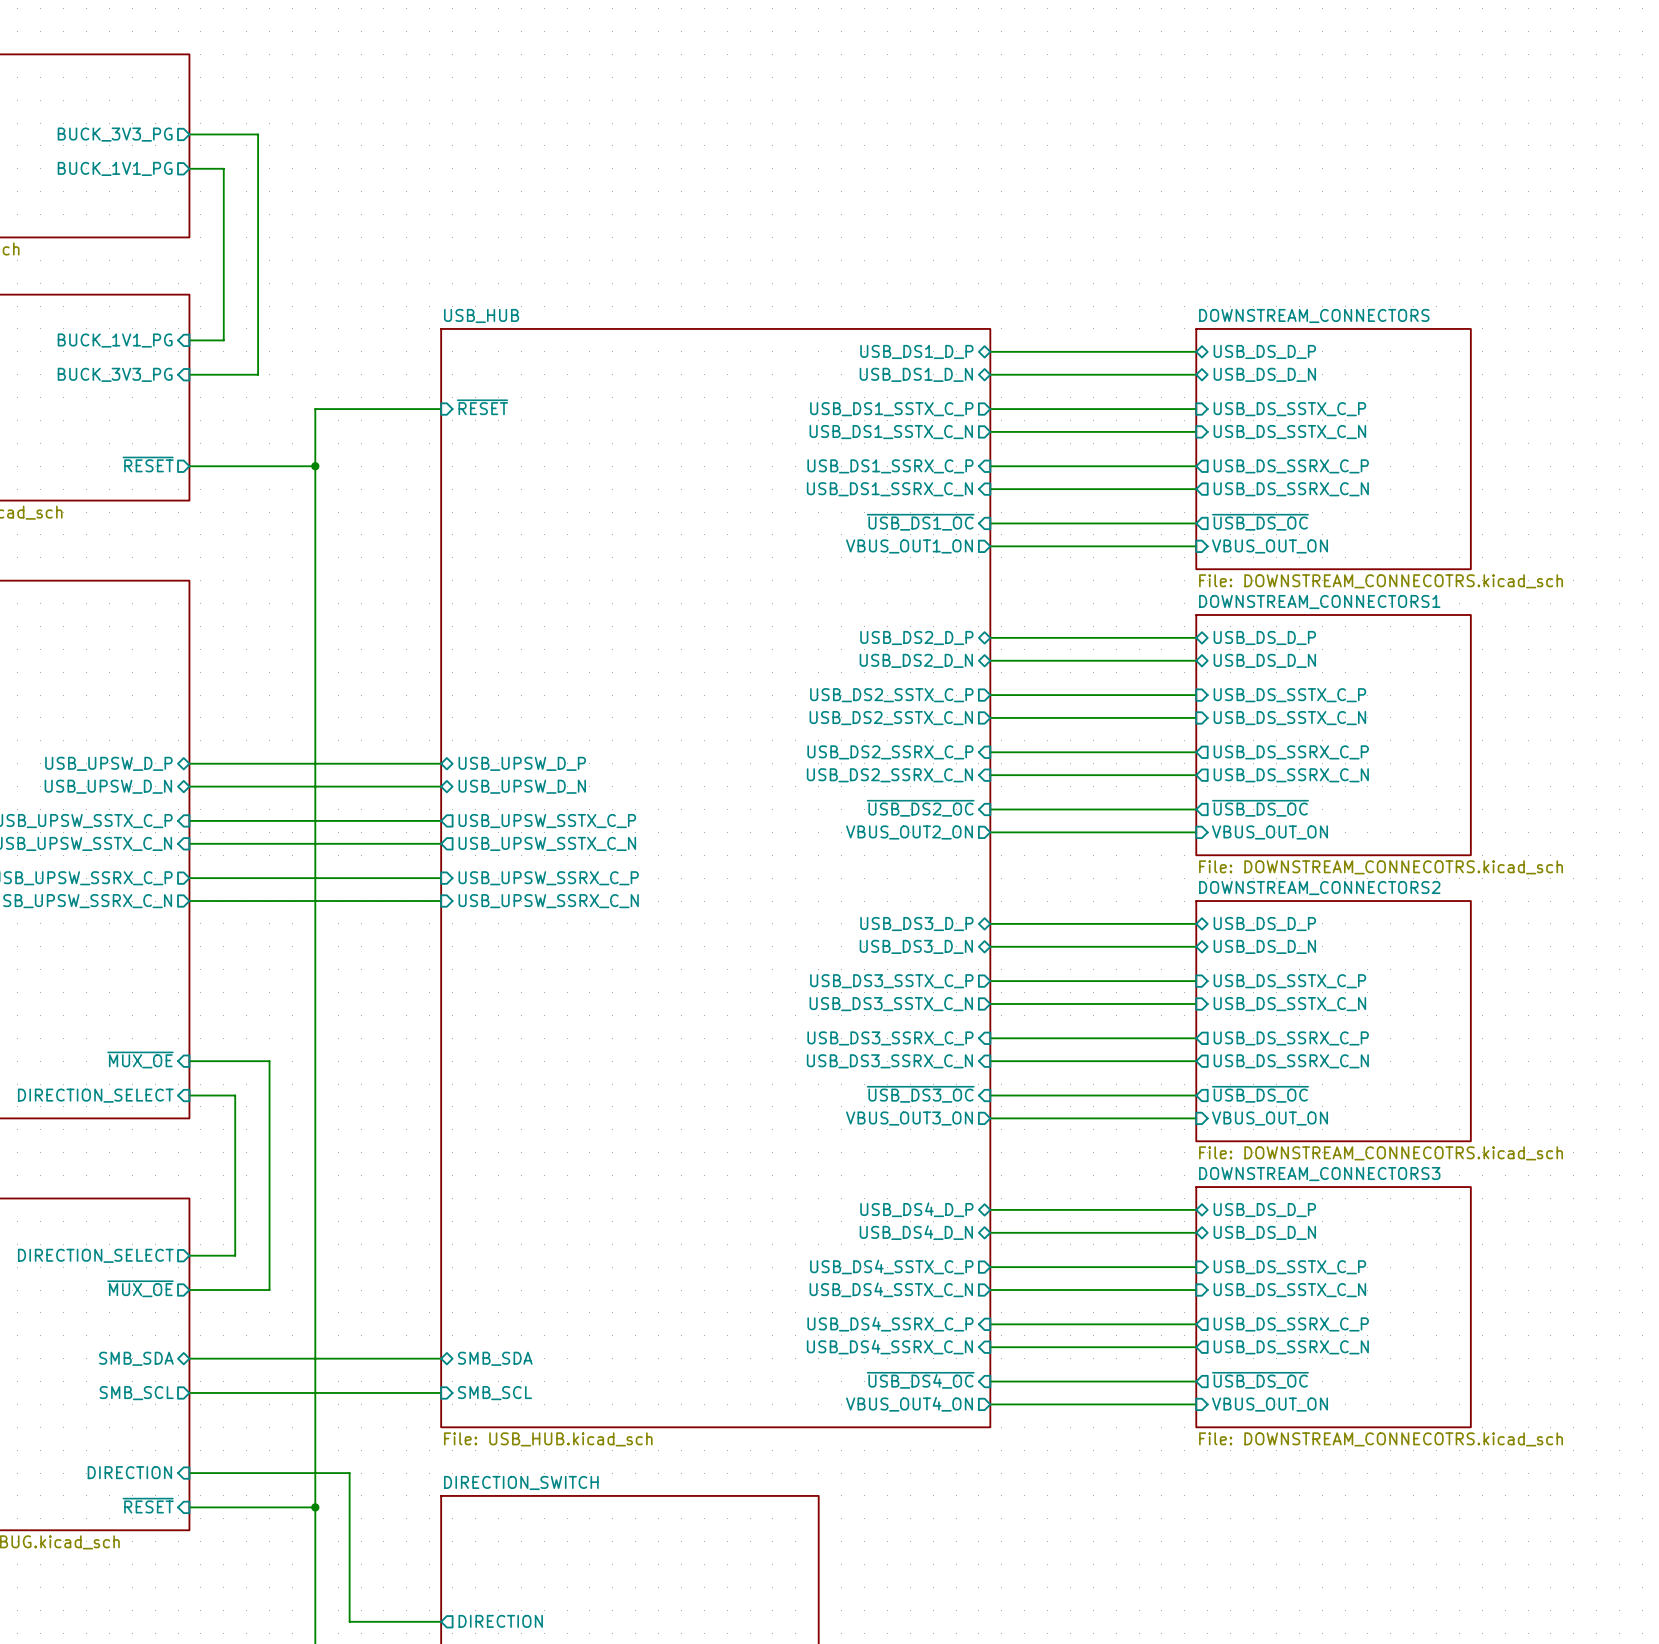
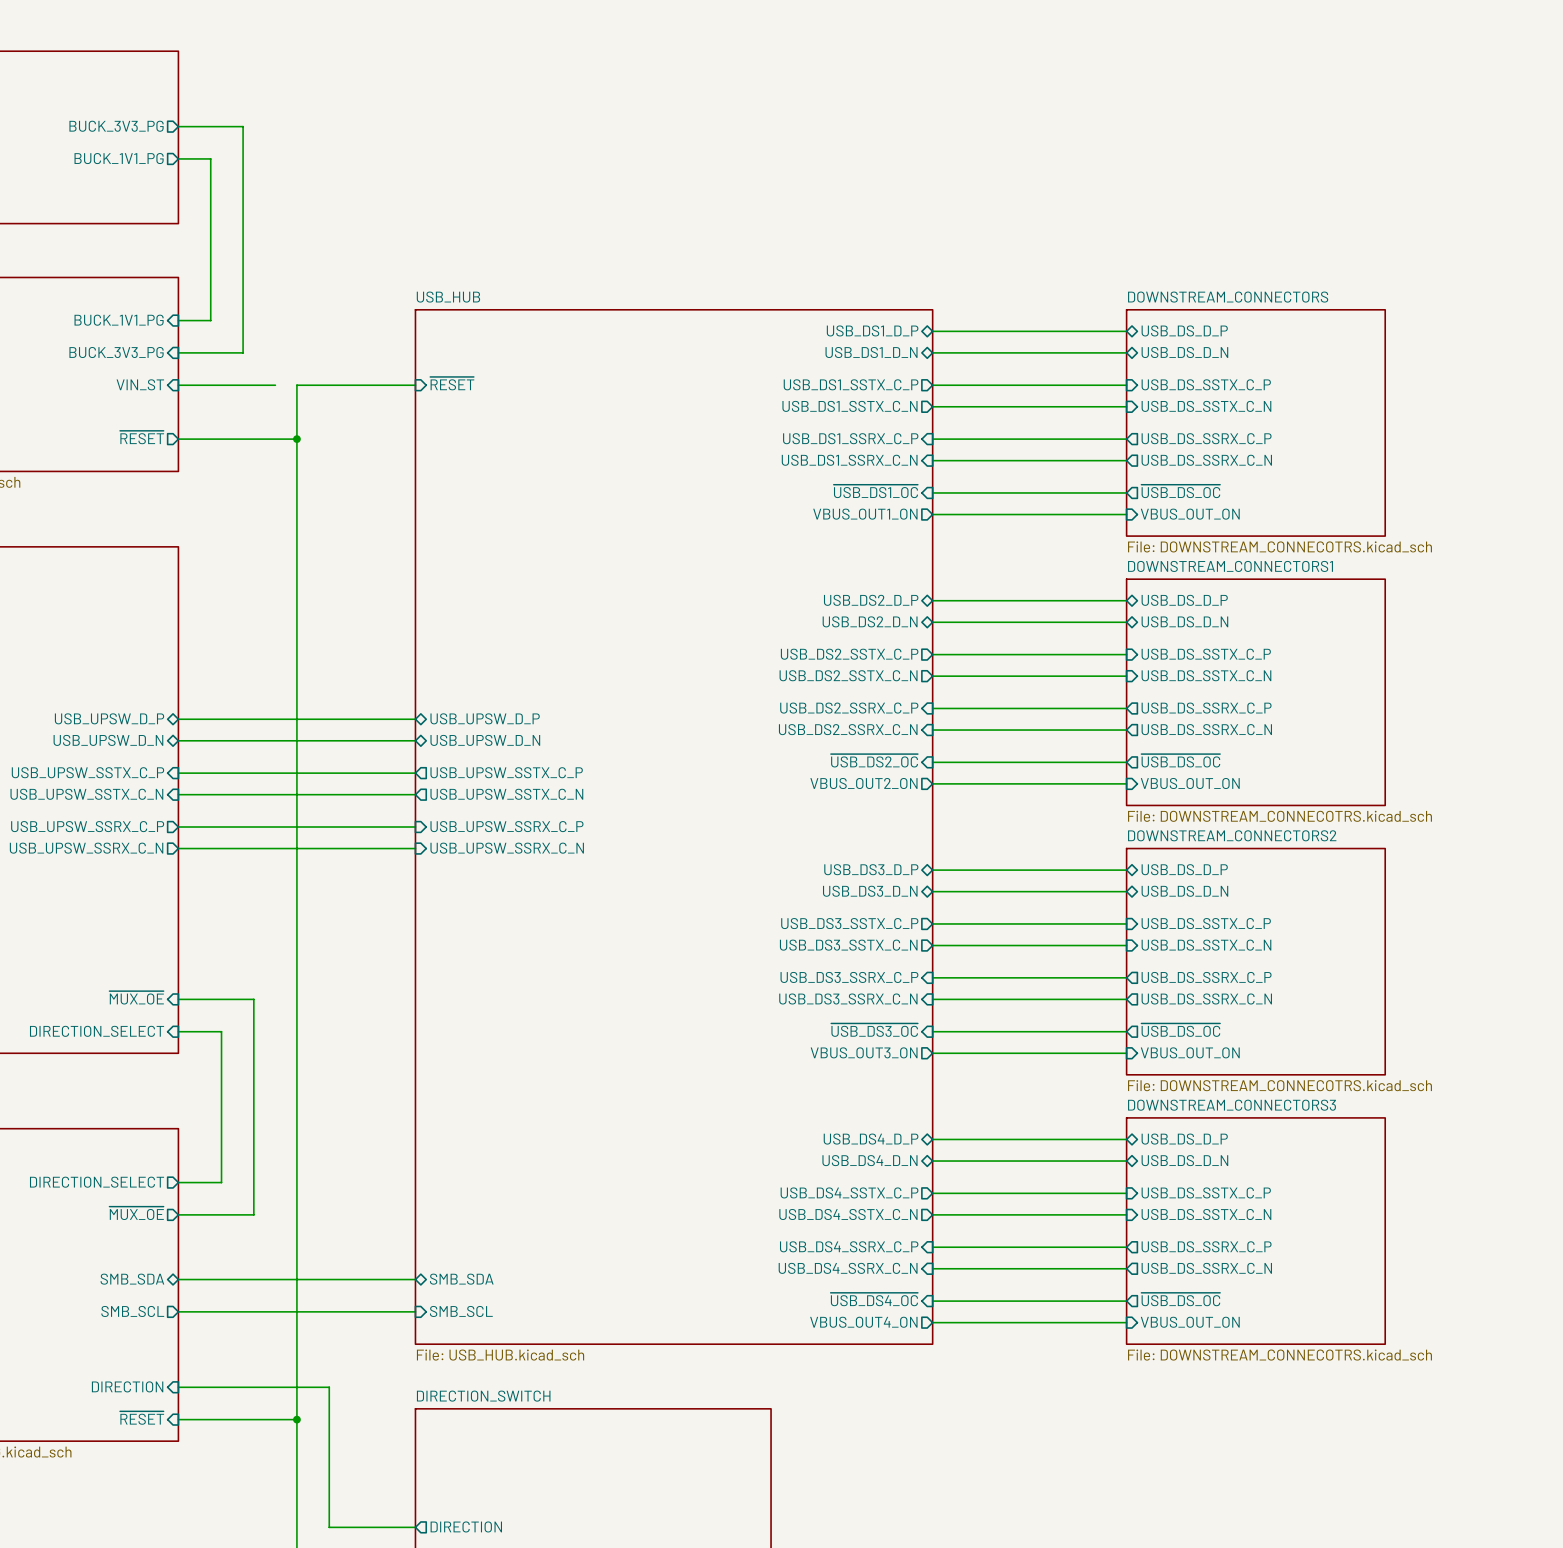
sheet pin: none -> VIN_ST (140, 384)
wire: none -> (178, 385) (275, 385)

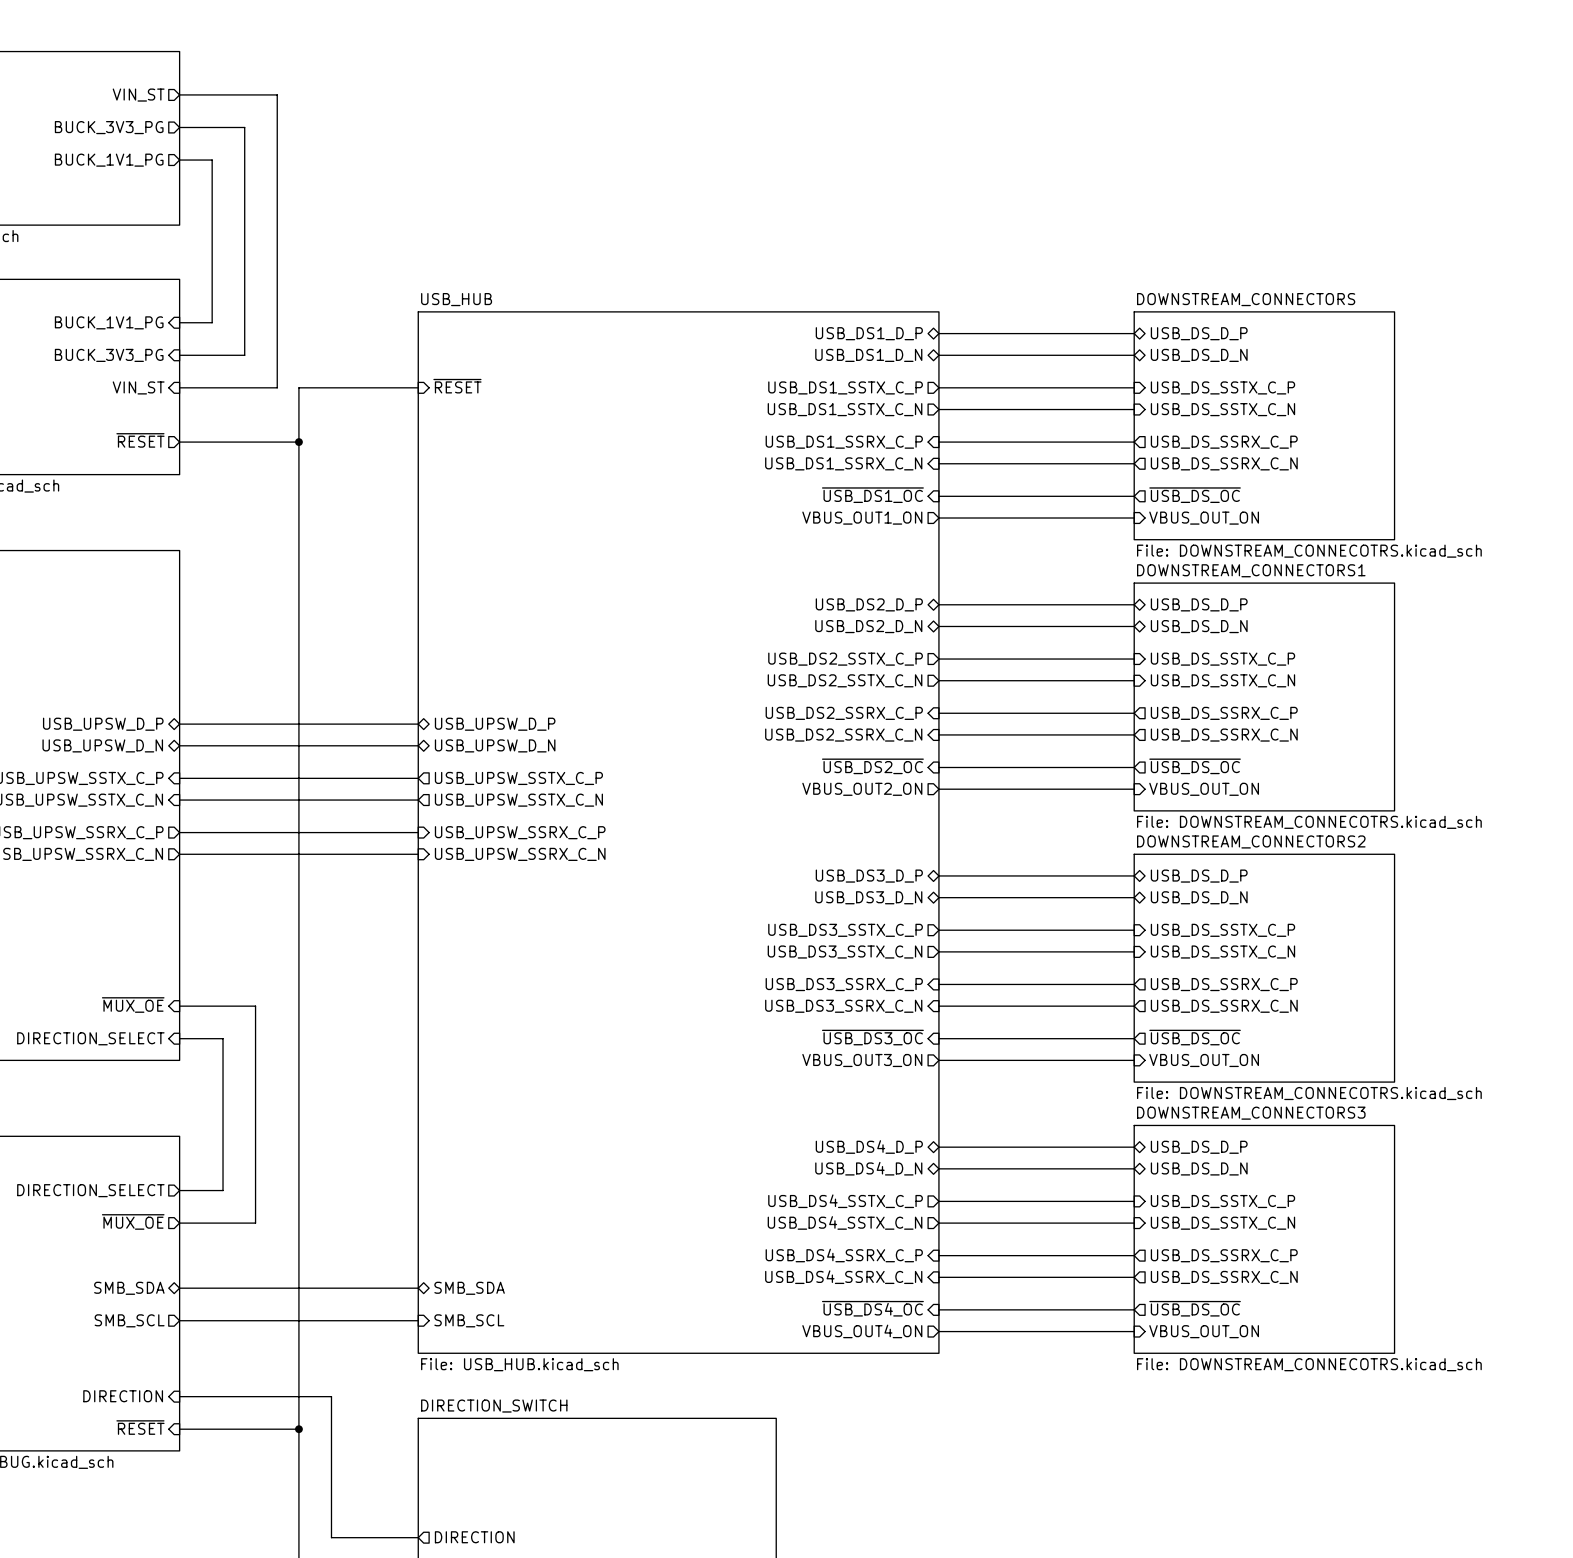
sheet pin: none -> VIN_ST (138, 95)
wire: none -> (179, 94) (277, 94) (277, 387)

